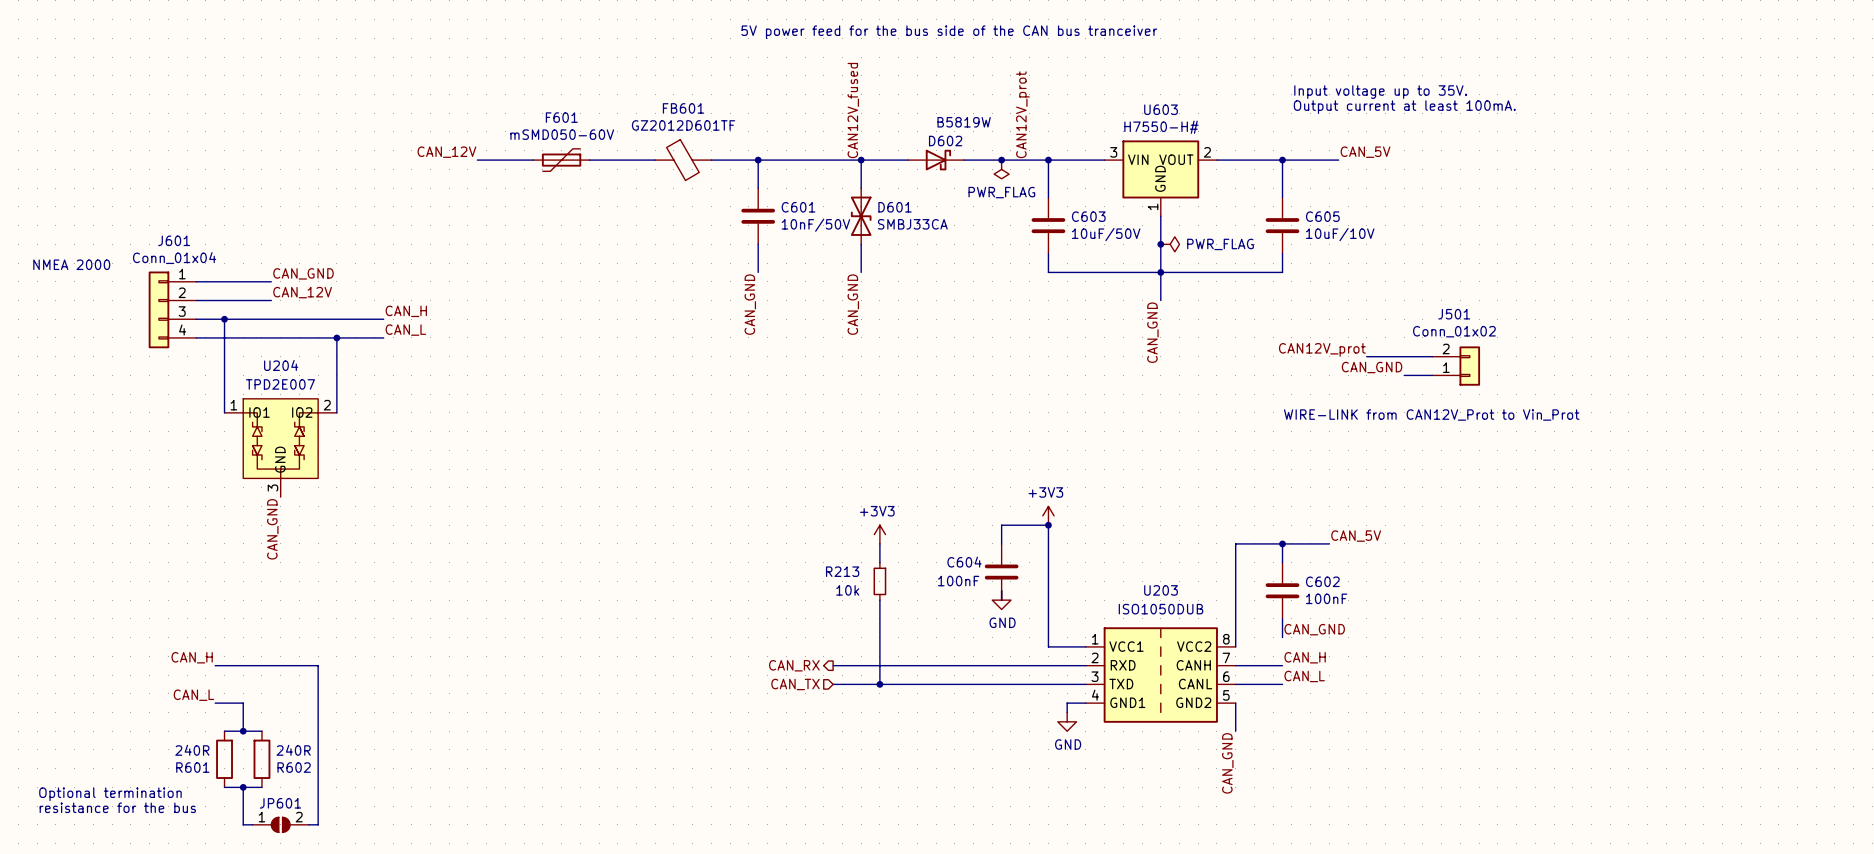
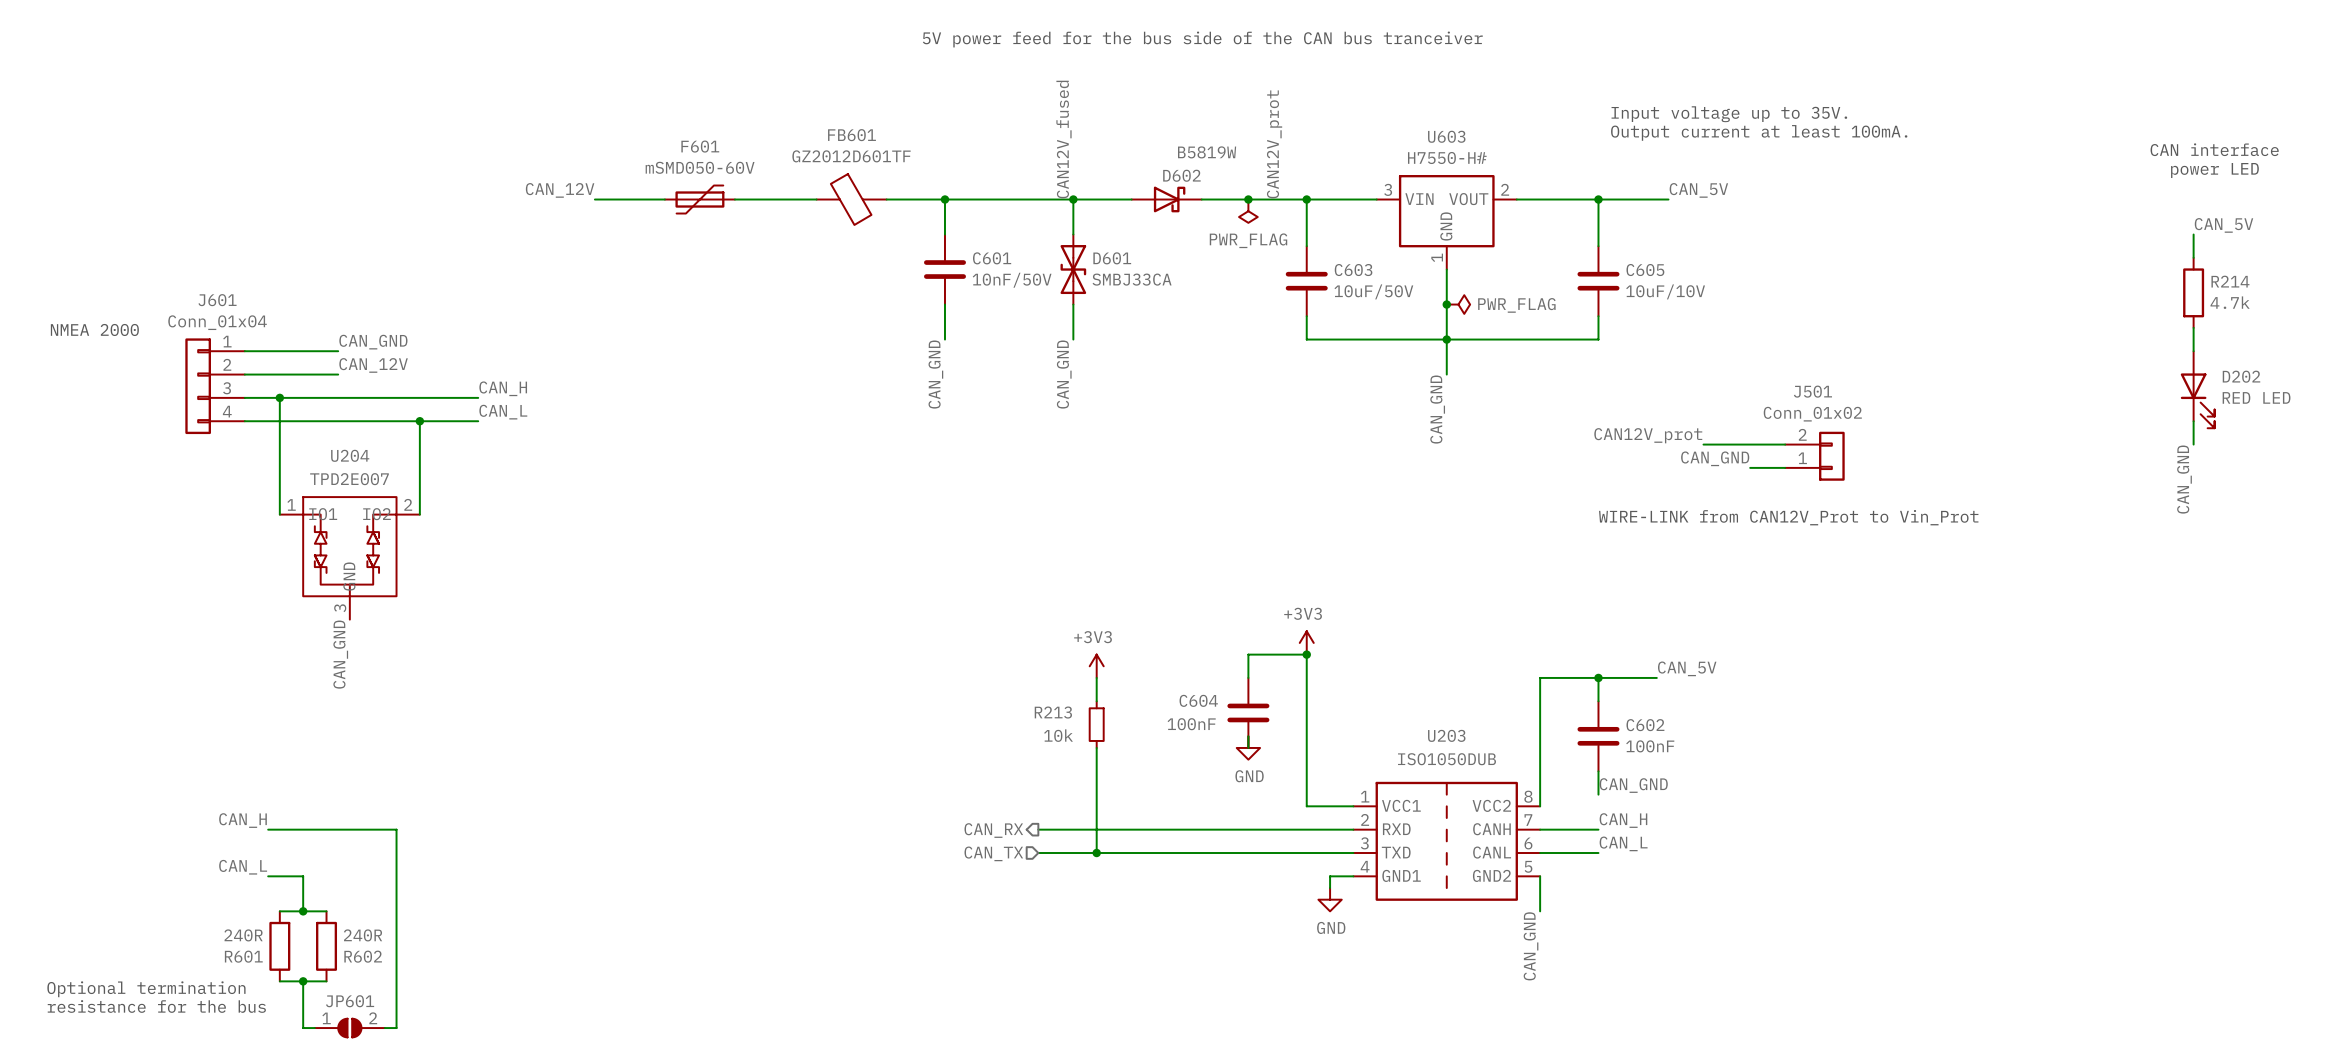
text: none -> CAN interface (2214, 149)
text: none -> power LED (2214, 170)
label: none -> CAN_5V (2223, 225)
wire: none -> (2193, 234) (2193, 257)
R214: none -> 4.7k (2193, 292)
wire: none -> (2193, 327) (2193, 351)
D202: none -> RED LED (2197, 389)
wire: none -> (2193, 421) (2193, 444)
label: none -> CAN_GND (2184, 479)

